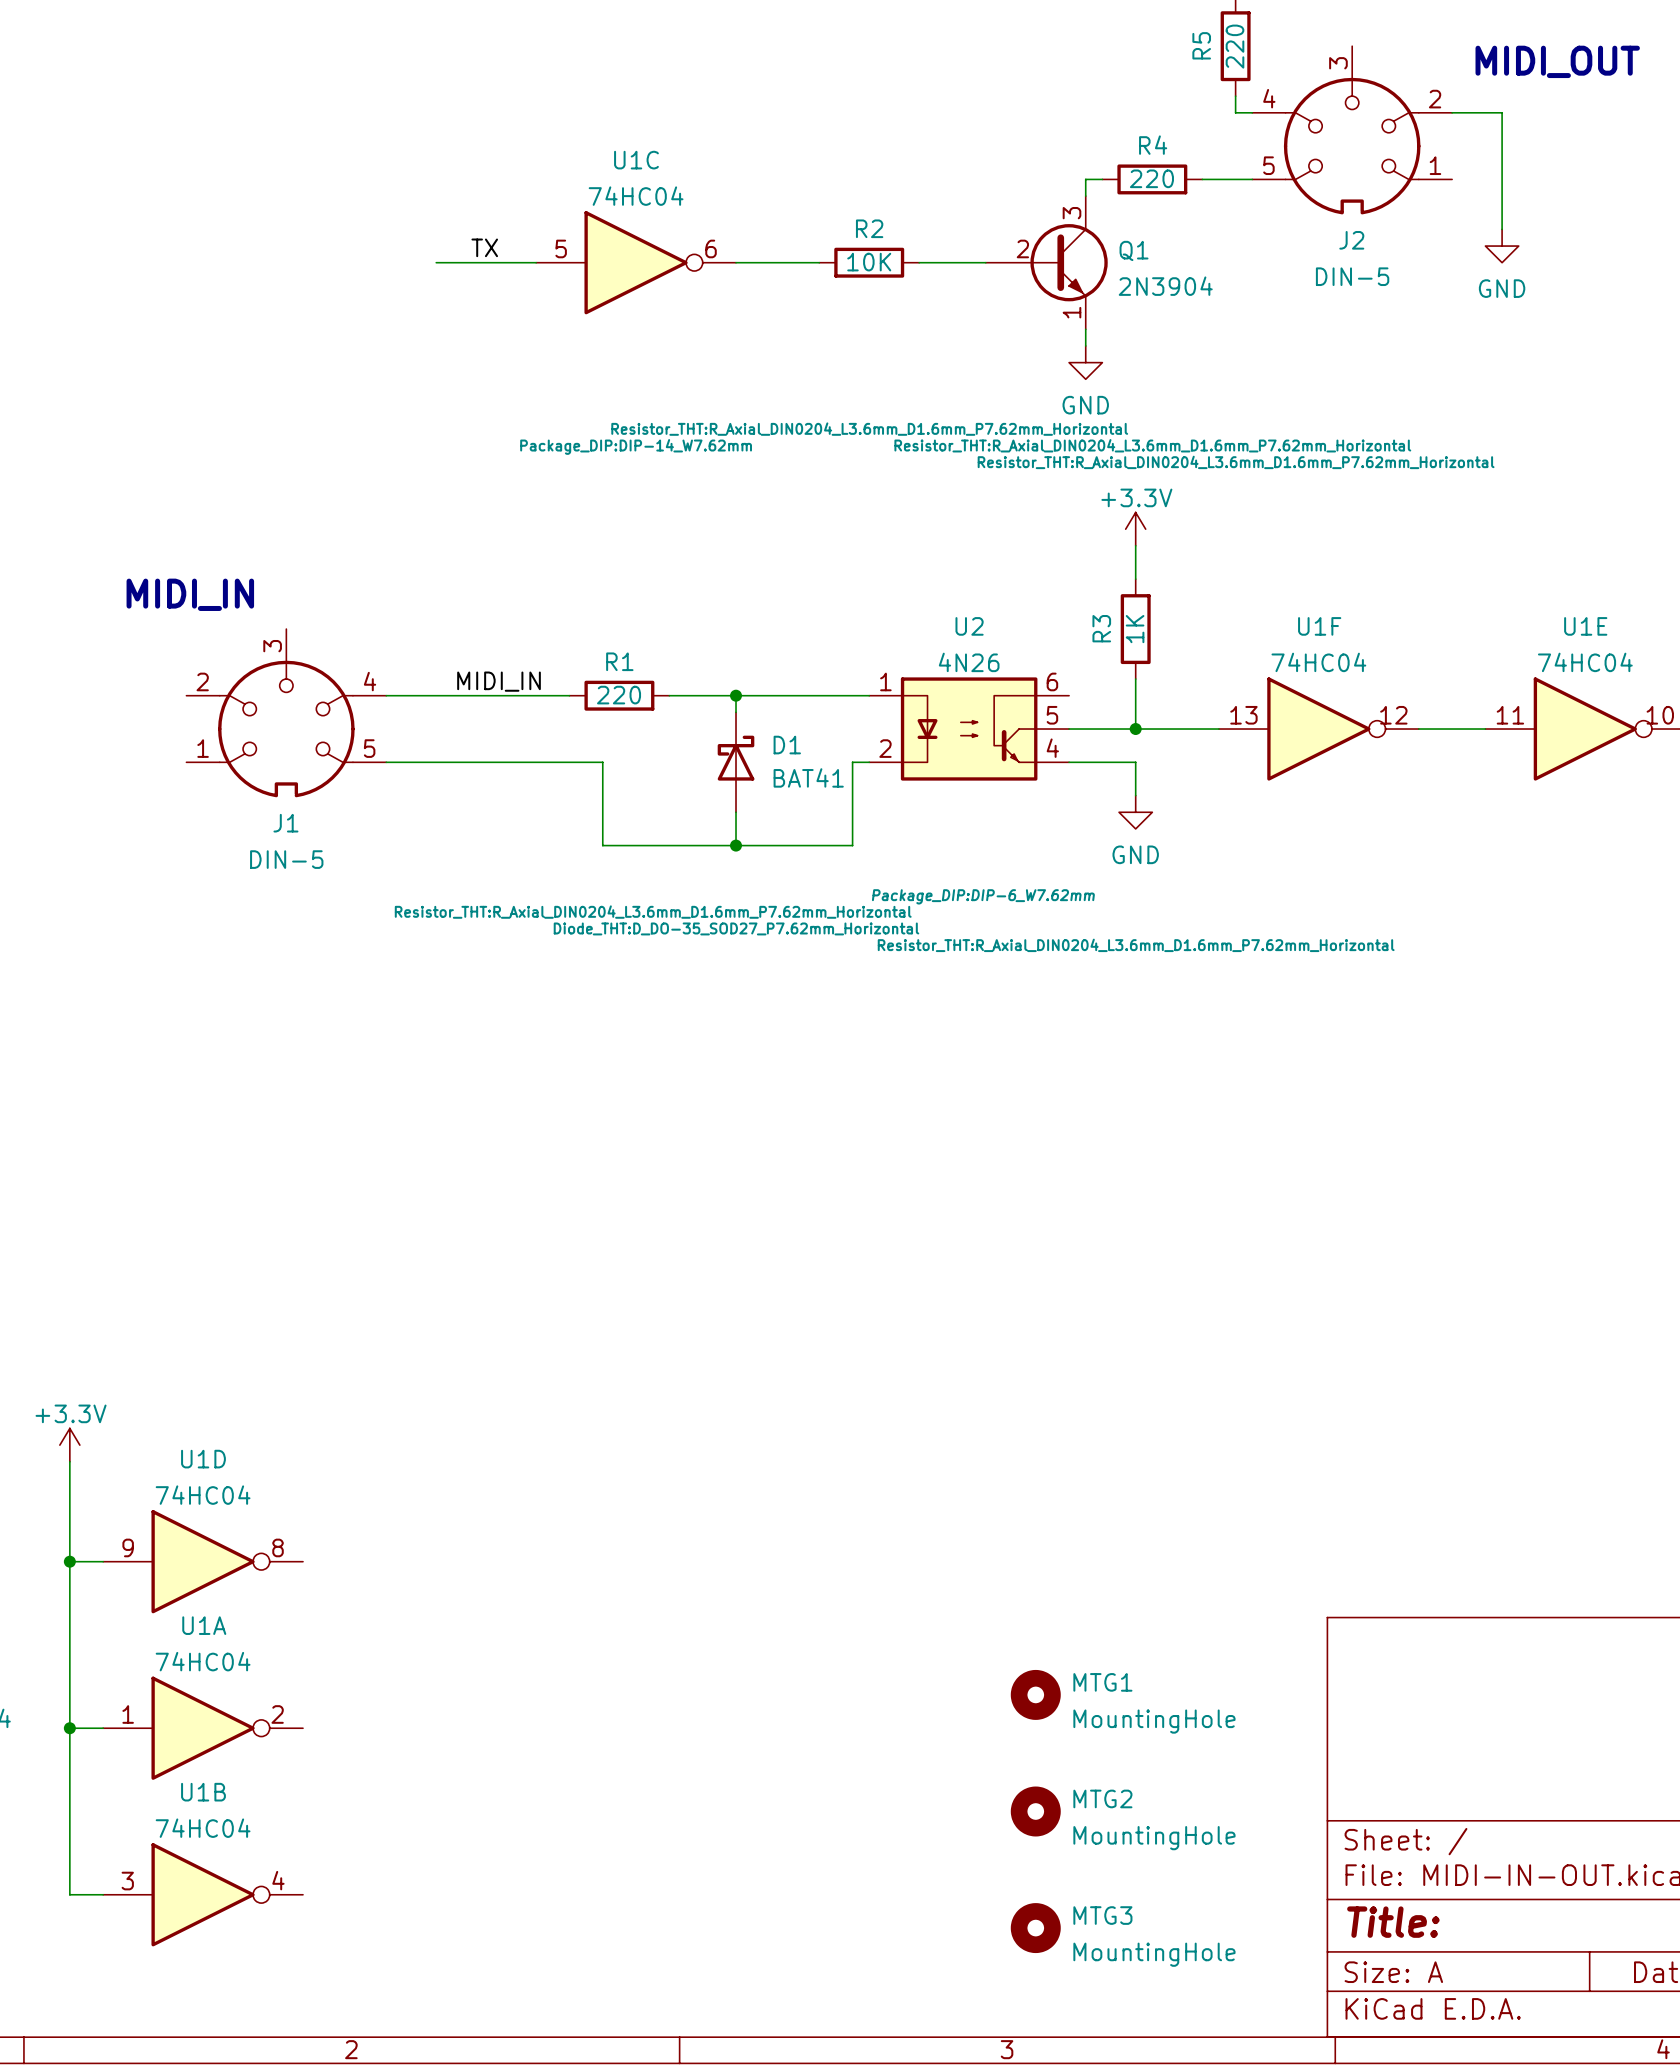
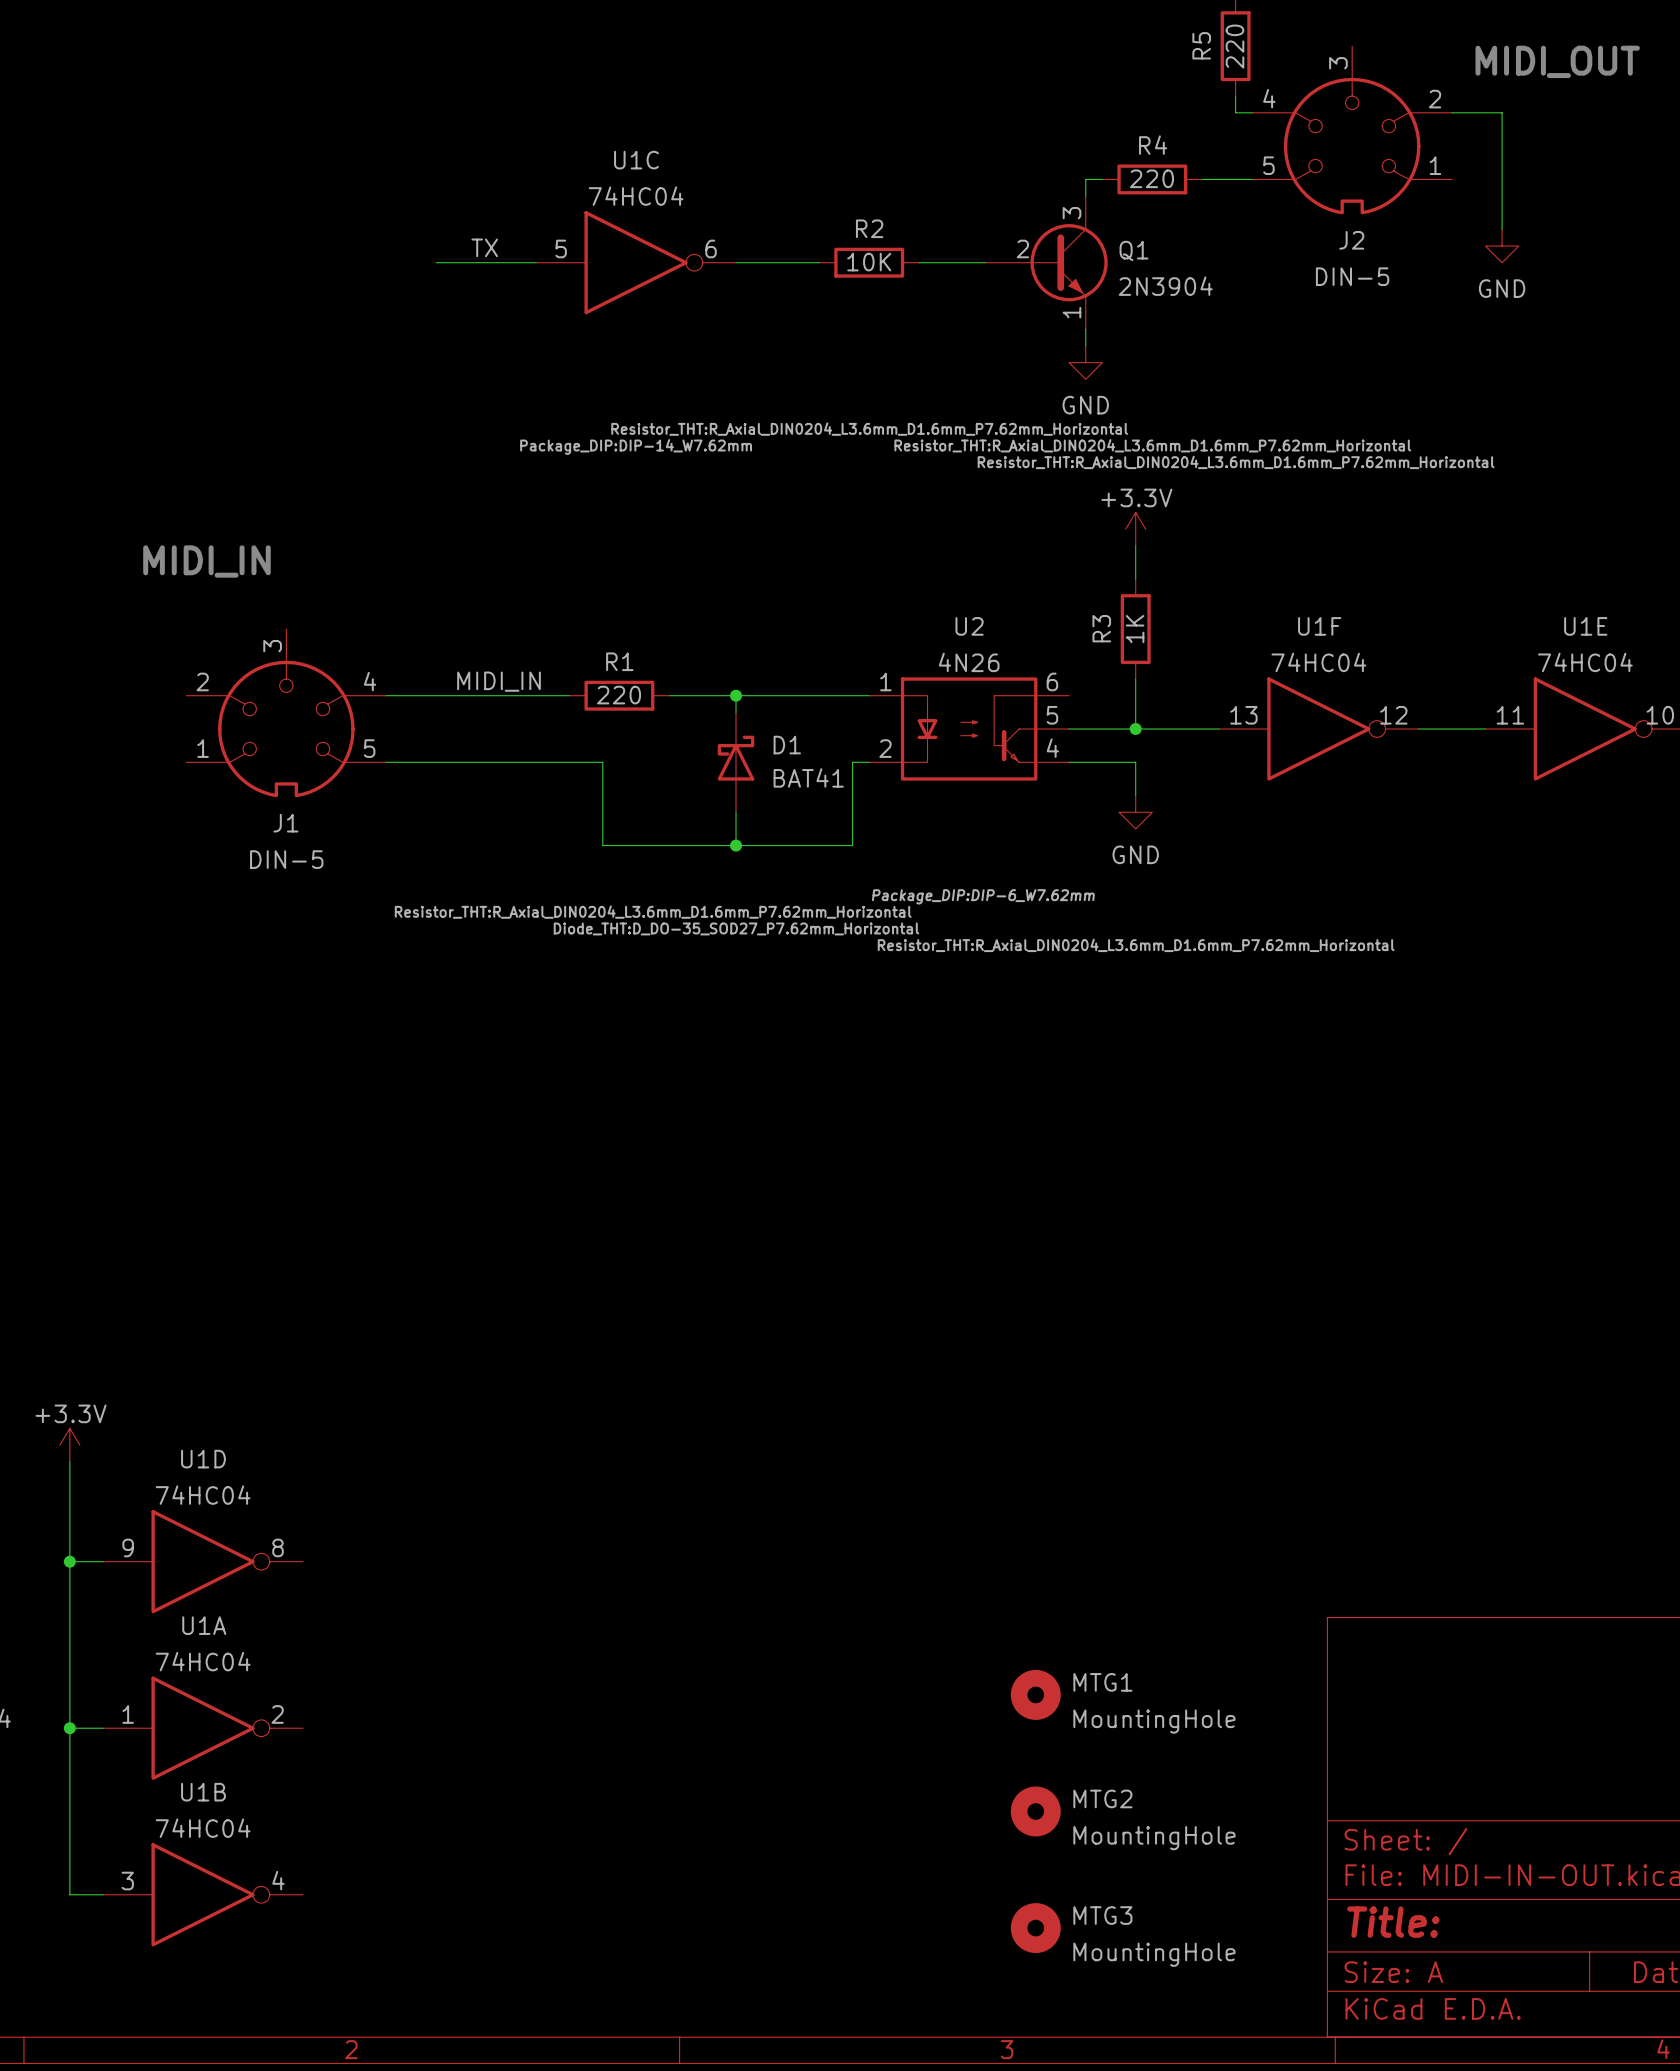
text position: MIDI_IN (190, 594) -> MIDI_IN (206, 561)

